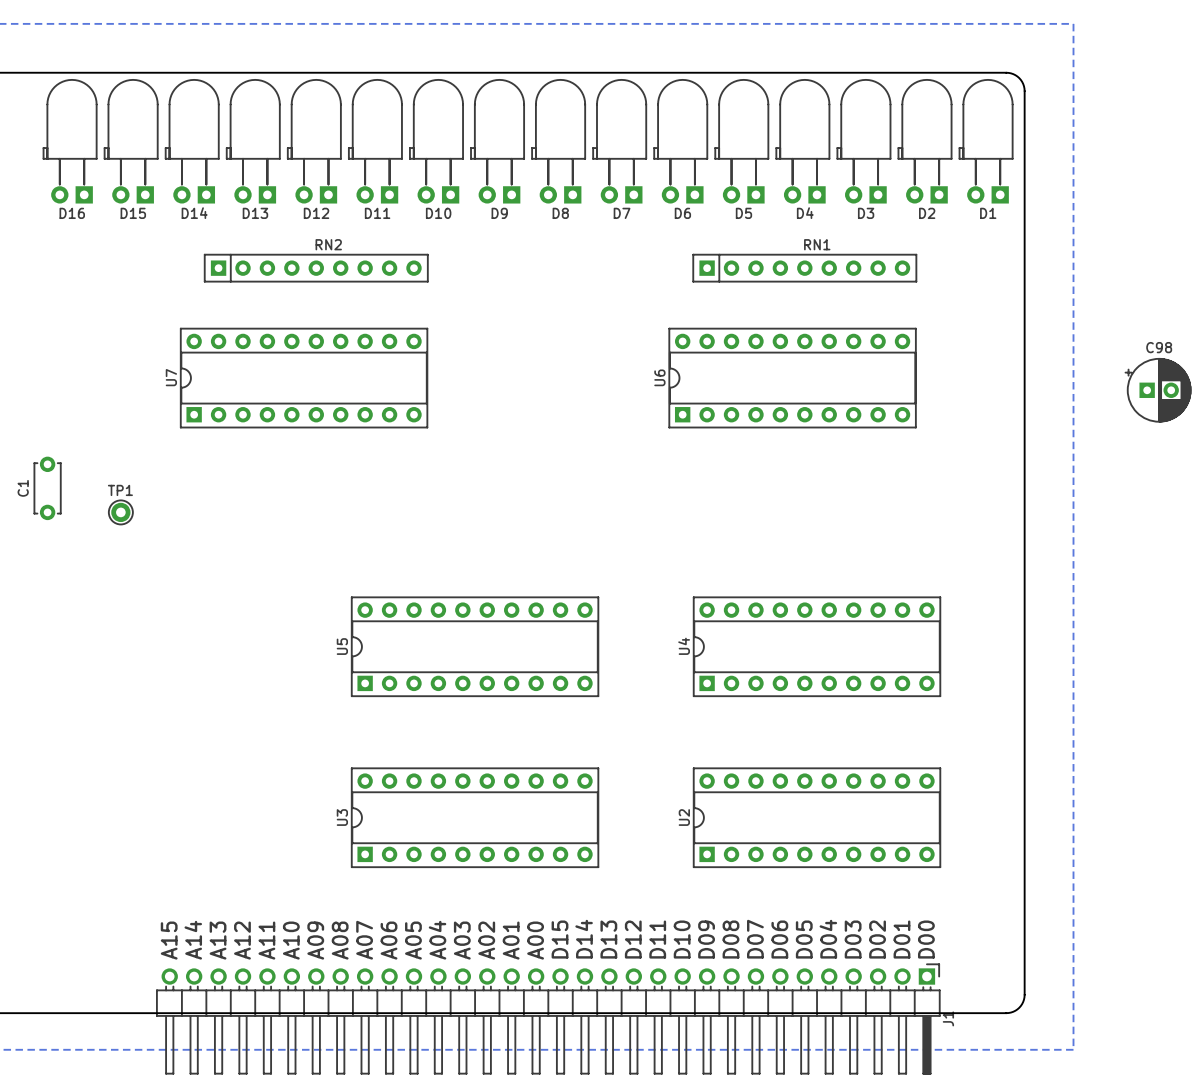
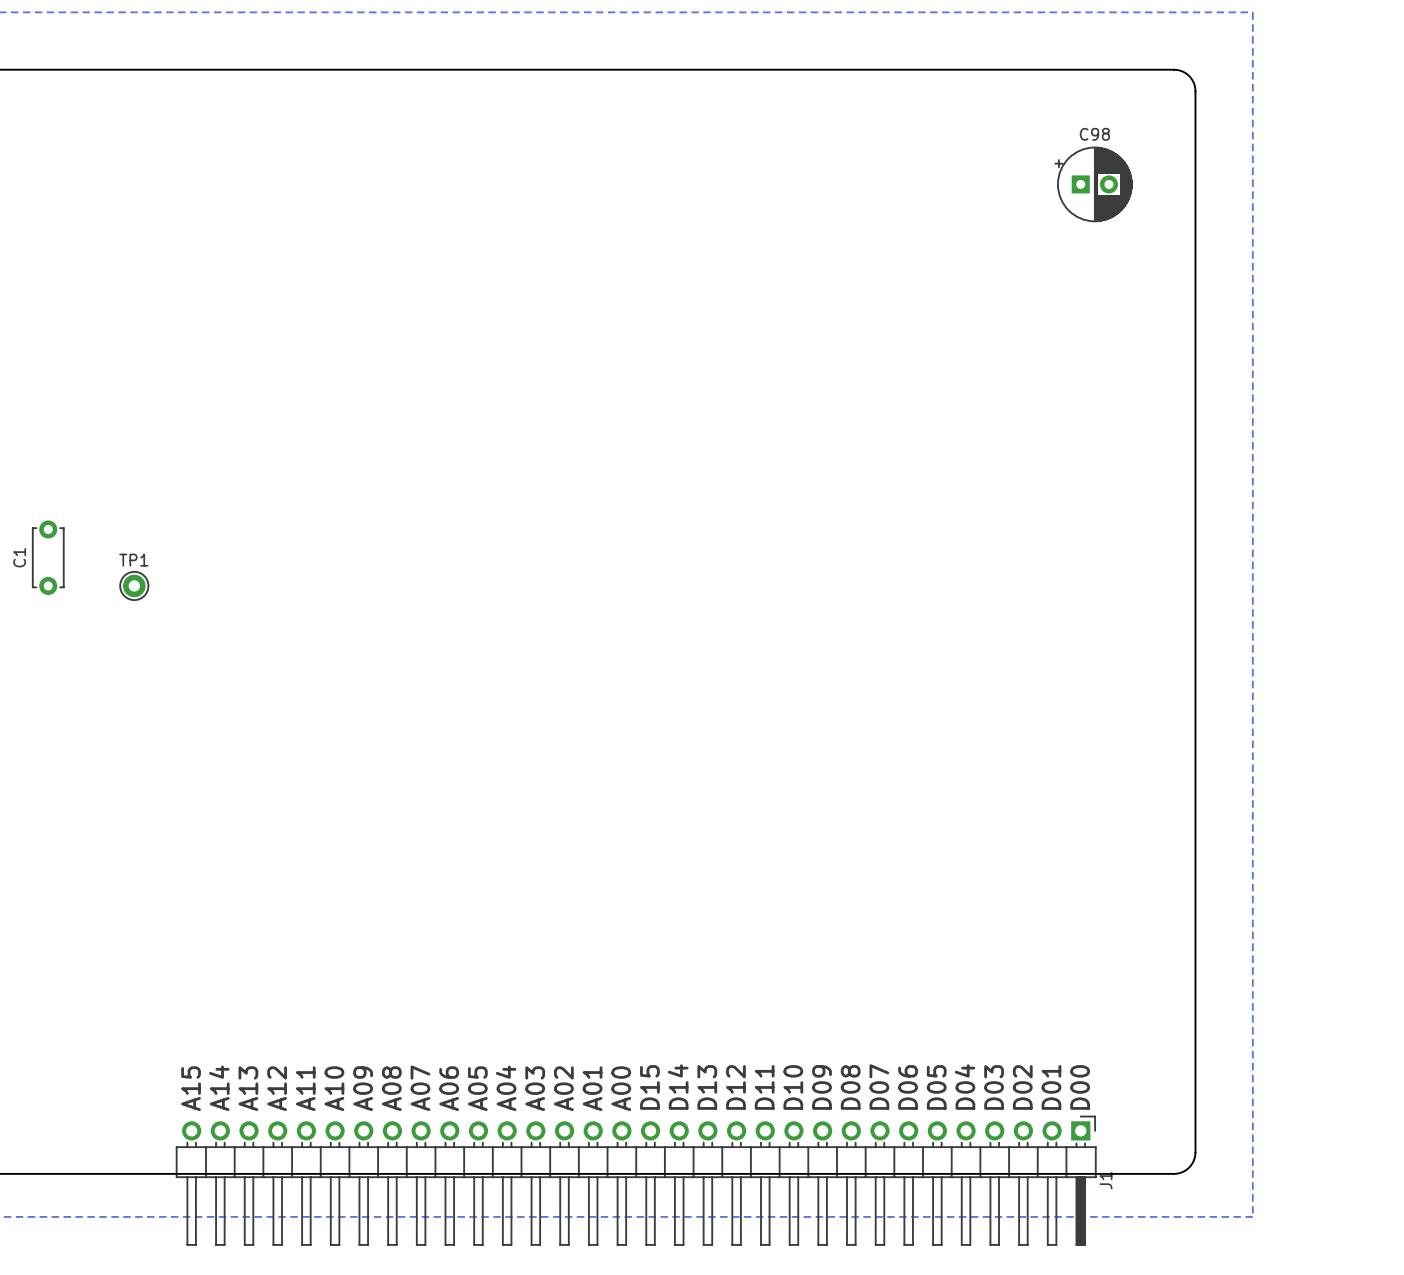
D16: (70, 141) -> none
D15: (131, 141) -> none
D14: (192, 141) -> none
D13: (253, 141) -> none
D12: (314, 141) -> none
D11: (375, 141) -> none
D10: (436, 141) -> none
D9: (497, 141) -> none
D8: (558, 141) -> none
D7: (619, 141) -> none
D6: (680, 141) -> none
D5: (741, 141) -> none
D4: (802, 141) -> none
D3: (863, 141) -> none
D2: (925, 141) -> none
D1: (986, 141) -> none
RN2: (316, 268) -> none
RN1: (804, 268) -> none
U7: (304, 378) -> none
U6: (792, 378) -> none
C98 position: (1158, 390) -> (1093, 184)
U5: (475, 646) -> none
U4: (817, 646) -> none
U3: (475, 817) -> none
U2: (817, 817) -> none

